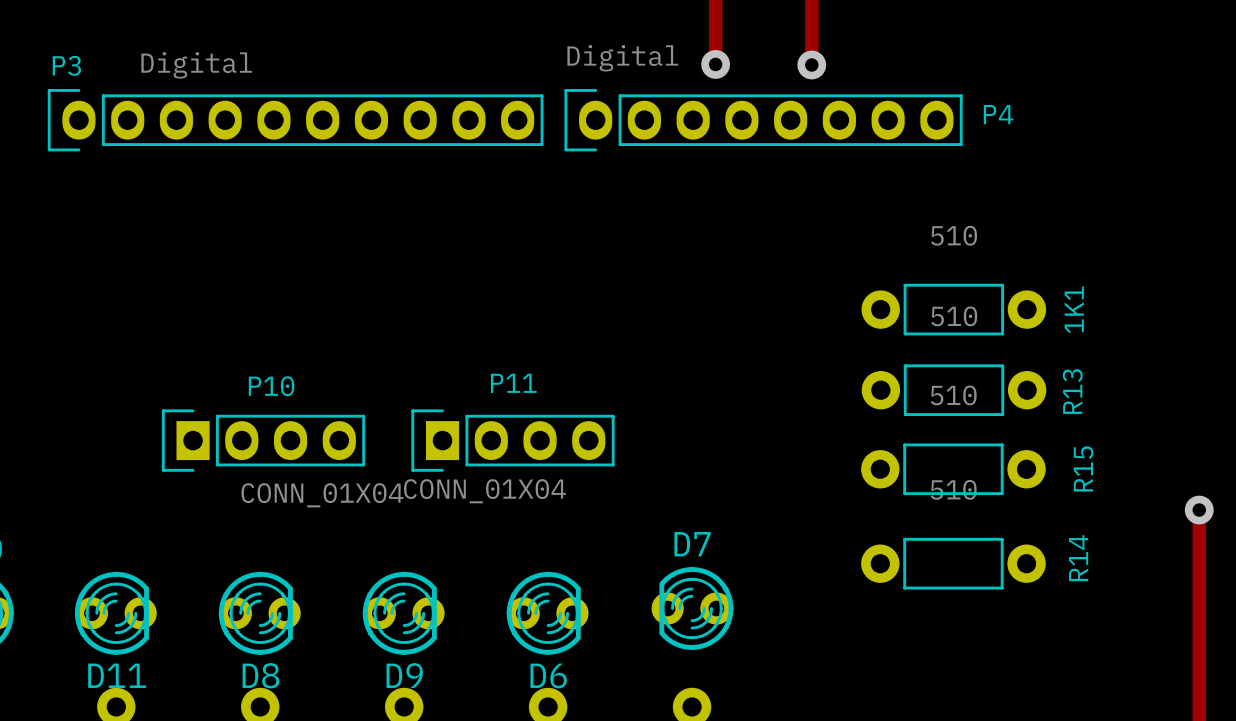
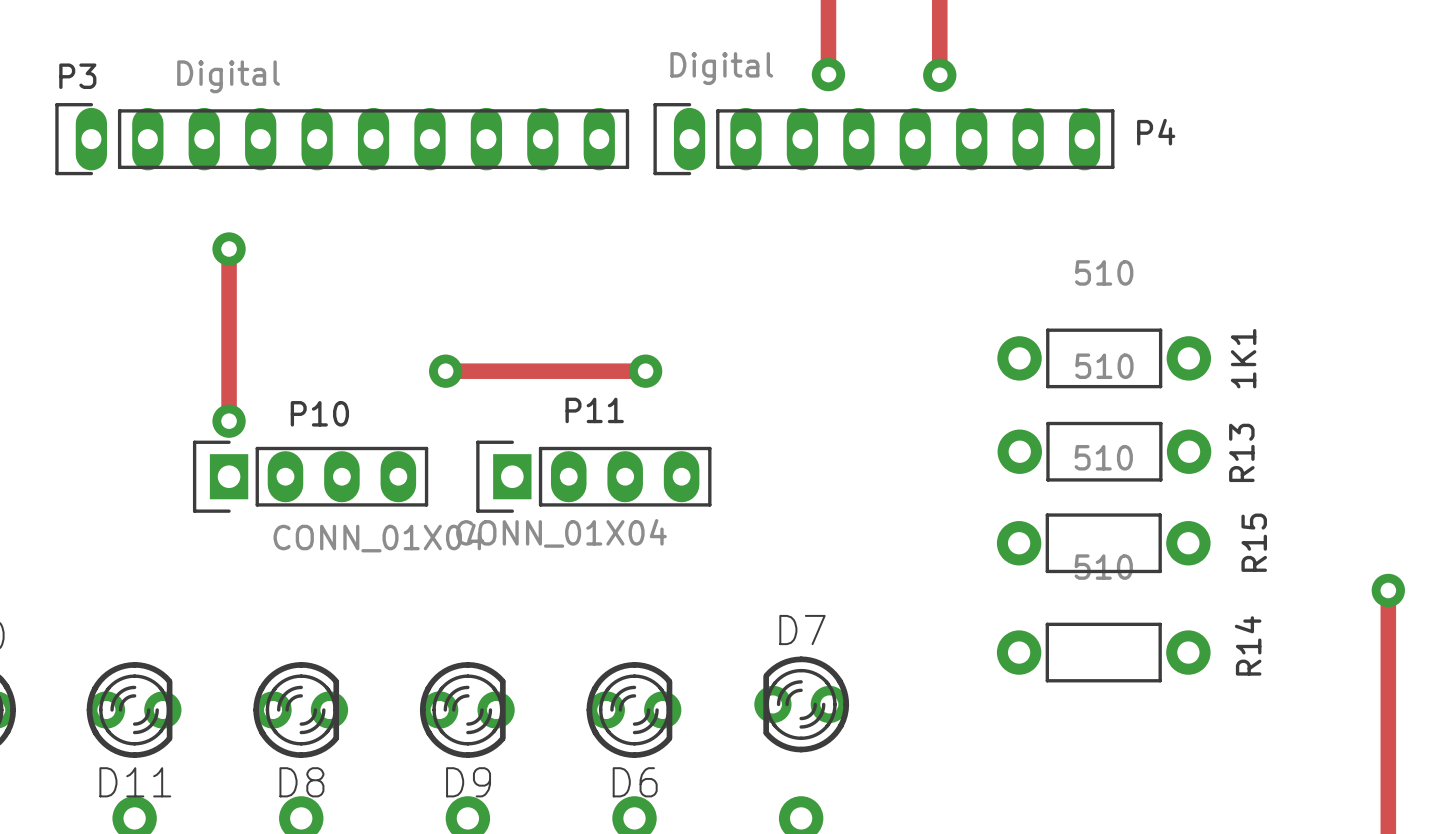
P3 footprint: [47, 88, 544, 152] -> [55, 103, 630, 176]
P4 footprint: [564, 88, 963, 152] -> [653, 103, 1115, 176]
track: none -> (229, 248) (229, 421)
via: none -> (229, 248)
track: none -> (445, 371) (645, 371)
via: none -> (445, 371)
via: none -> (645, 371)
via: none -> (229, 421)
P10 footprint: [161, 409, 366, 472] -> [192, 440, 429, 513]
P11 footprint: [411, 409, 615, 472] -> [476, 440, 712, 513]

